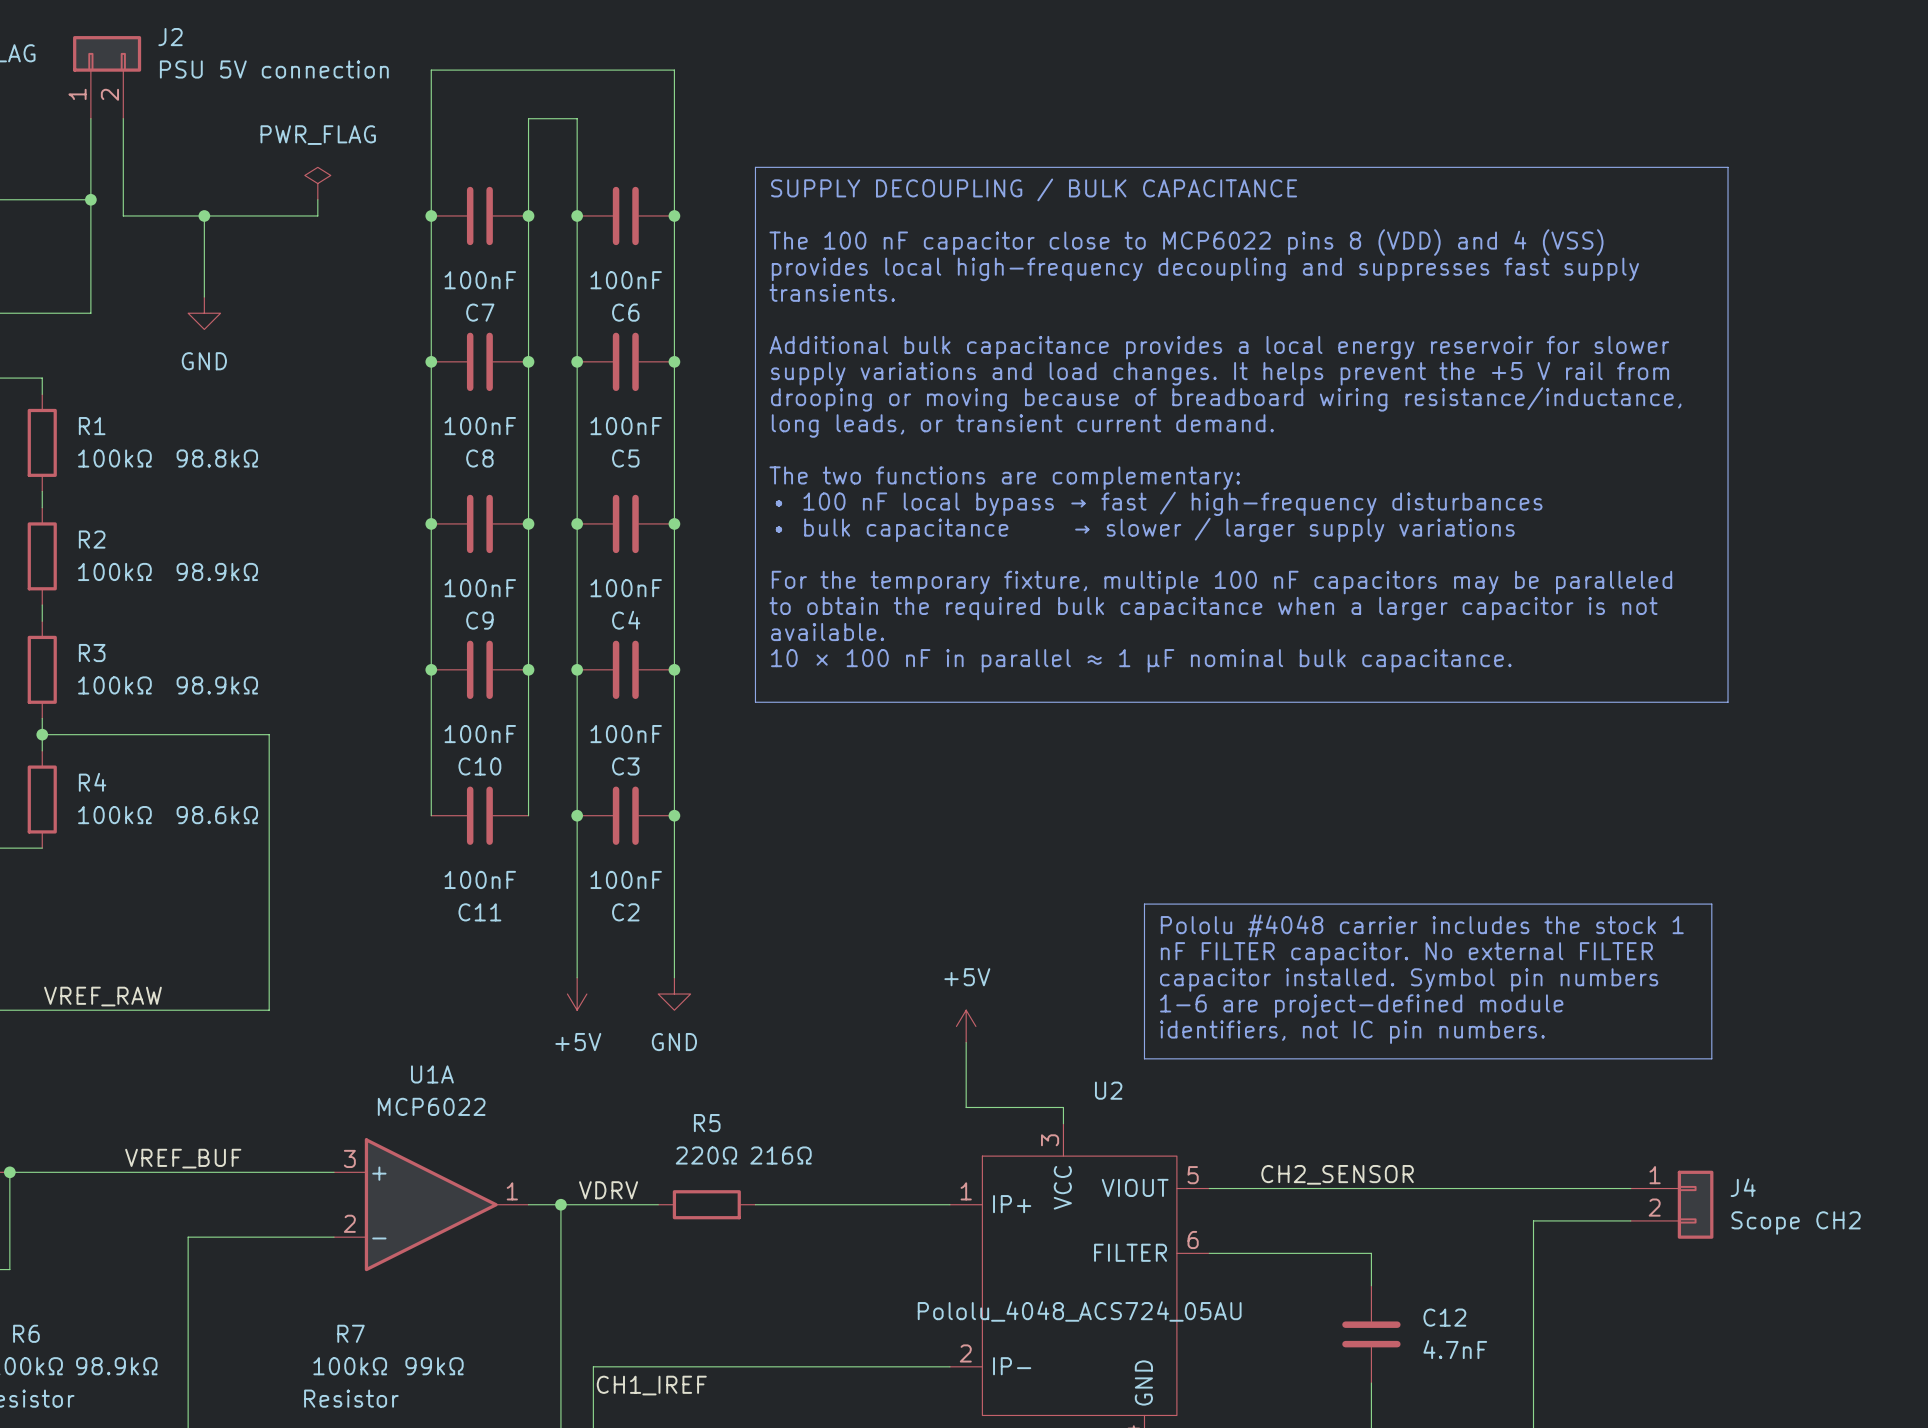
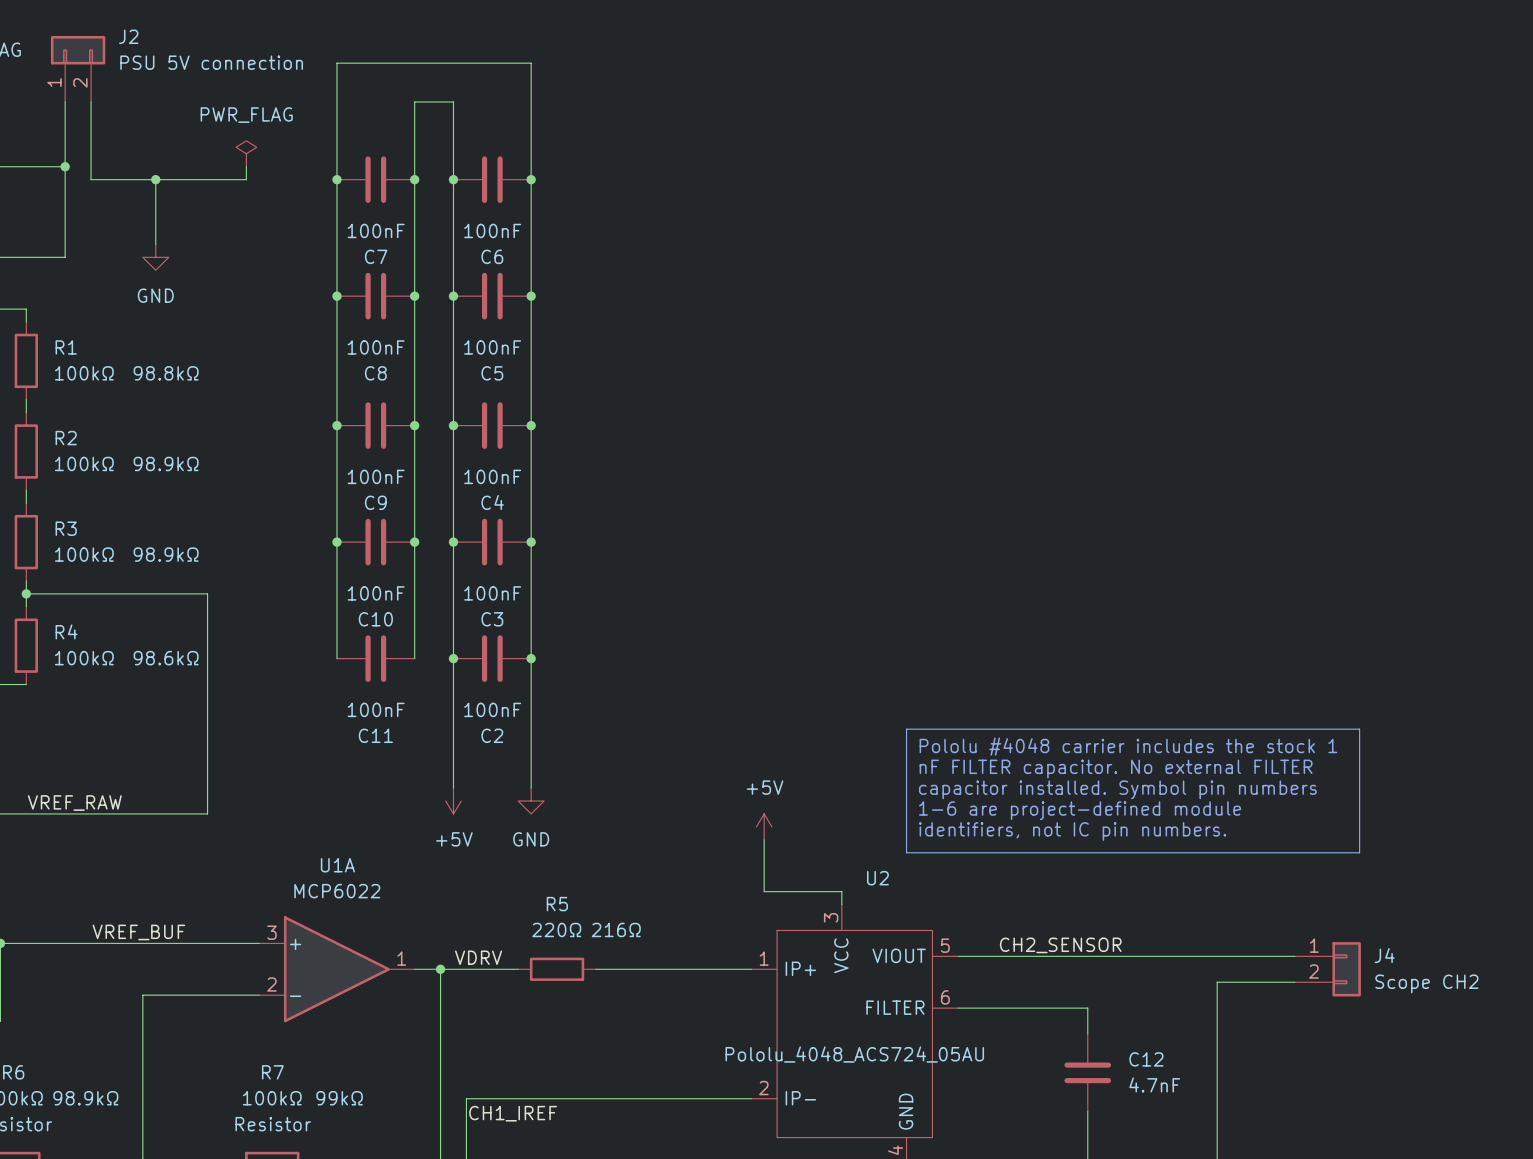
line: (755, 167) (1728, 167) (1728, 702) (755, 702) (755, 167) -> none
text: SUPPLY DECOUPLING / BULK CAPACITANCE (1034, 189) -> none
text: The 100 nF capacitor close to MCP6022 pins 8 (VDD) and 4 (VSS) (1186, 242) -> none
text: provides local high-frequency decoupling and suppresses fast supply (1205, 269) -> none
text: transients. (832, 292) -> none
text: Additional bulk capacitance provides a local energy reservoir for slower (1219, 347) -> none
text: supply variations and load changes. It helps prevent the +5 V rail from (1220, 373) -> none
text: drooping or moving because of breadboard wiring resistance/inductance, (1226, 399) -> none
text: long leads, or transient current demand. (1022, 425) -> none
text: The two functions are complementary: (1004, 478) -> none
text: • 100 nF local bypass → fast / high-frequency disturbances (1159, 503) -> none
text: • bulk capacitance → slower / larger supply variations (1145, 529) -> none
text: For the temporary fixture, multiple 100 nF capacitors may be paralleled (1221, 582) -> none
text: to obtain the required bulk capacitance when a larger capacitor is not (1213, 608) -> none
text: available. (827, 632) -> none
text: 10 × 100 nF in parallel ≈ 1 µF nominal bulk capacitance. (1141, 660) -> none

